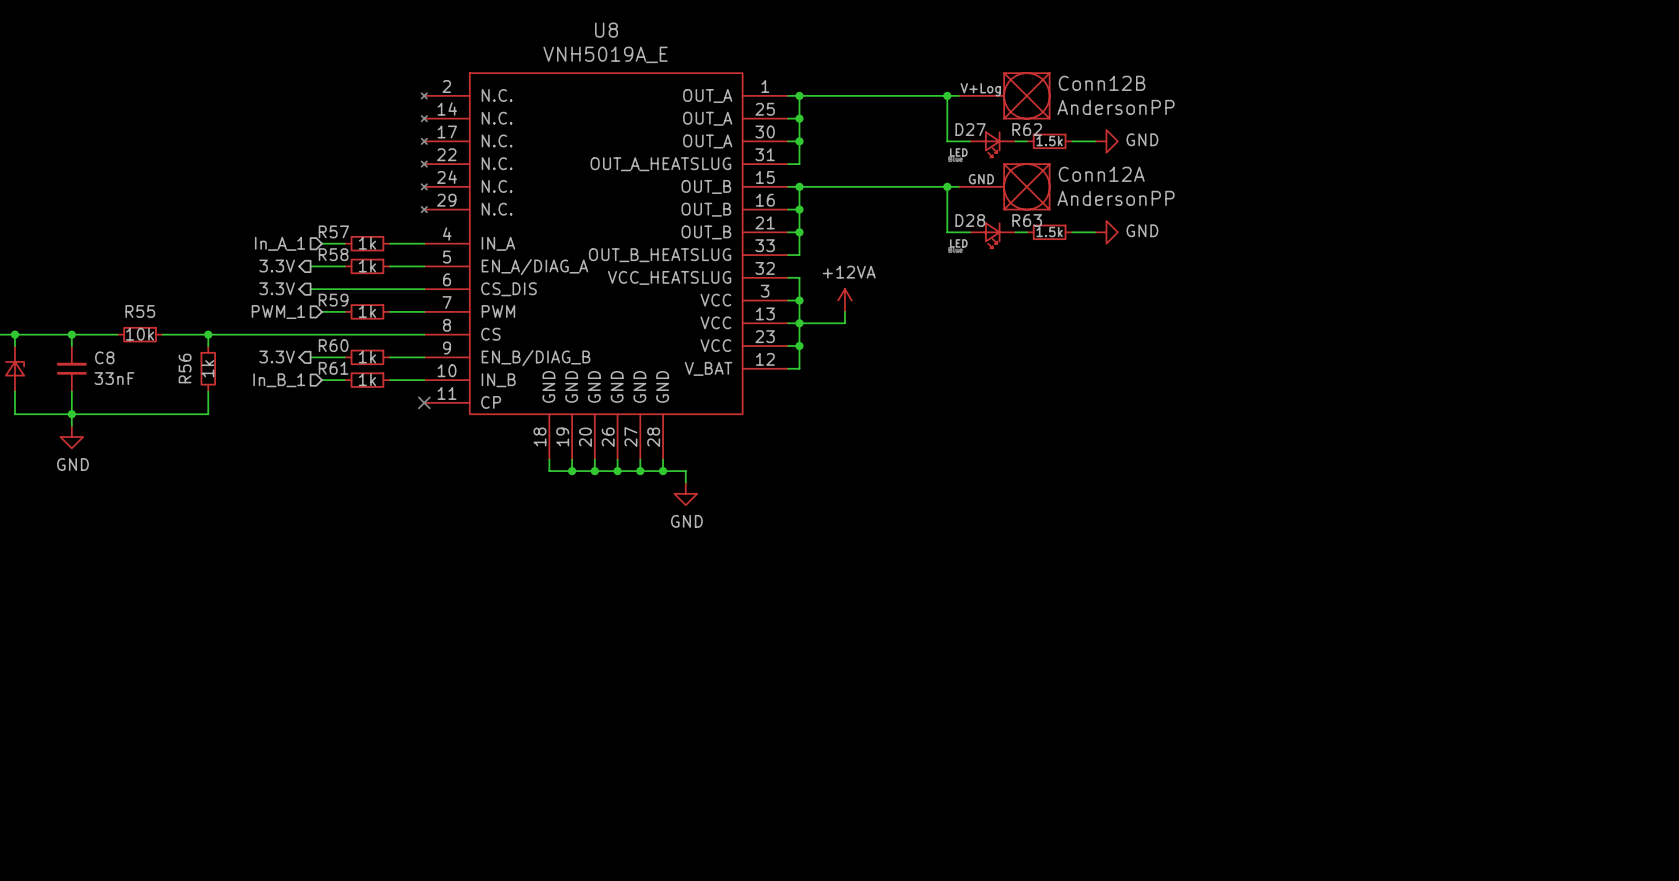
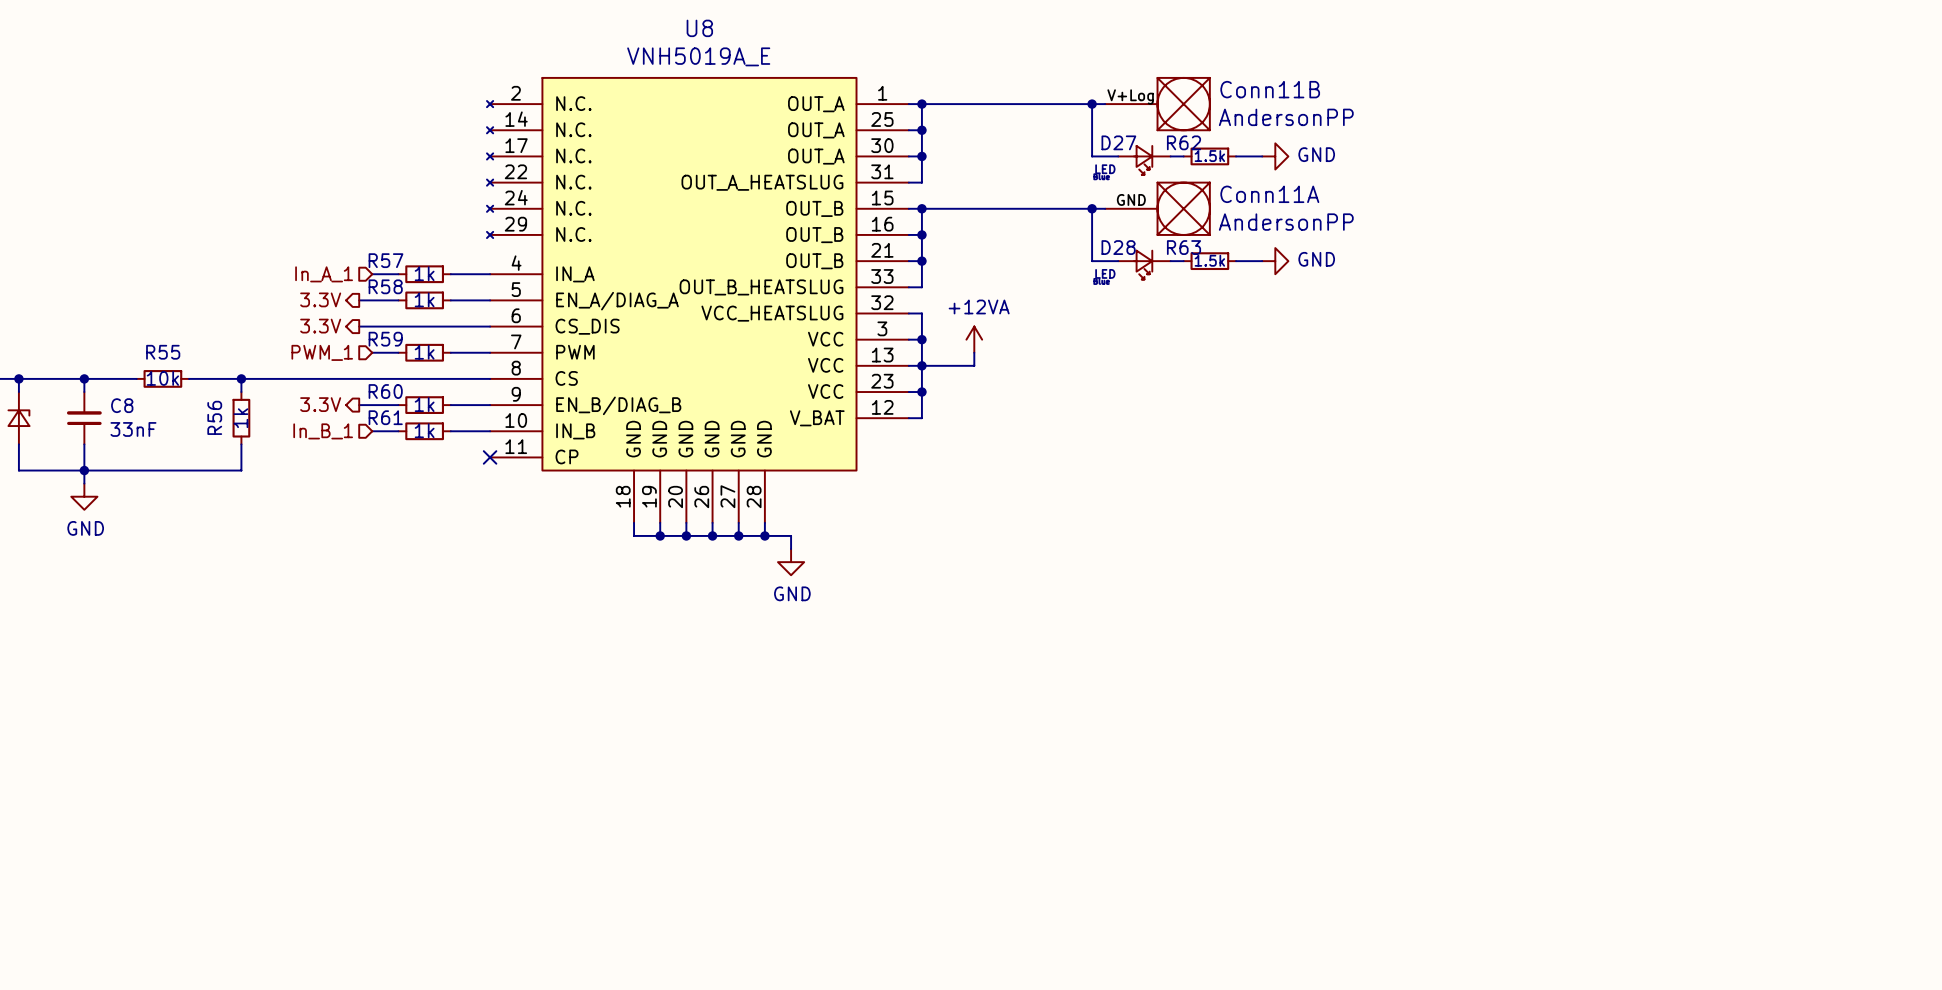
Conn12B name: Conn12B (1102, 83) -> Conn11B (1270, 89)
Conn12A name: Conn12A (1101, 174) -> Conn11A (1269, 194)

